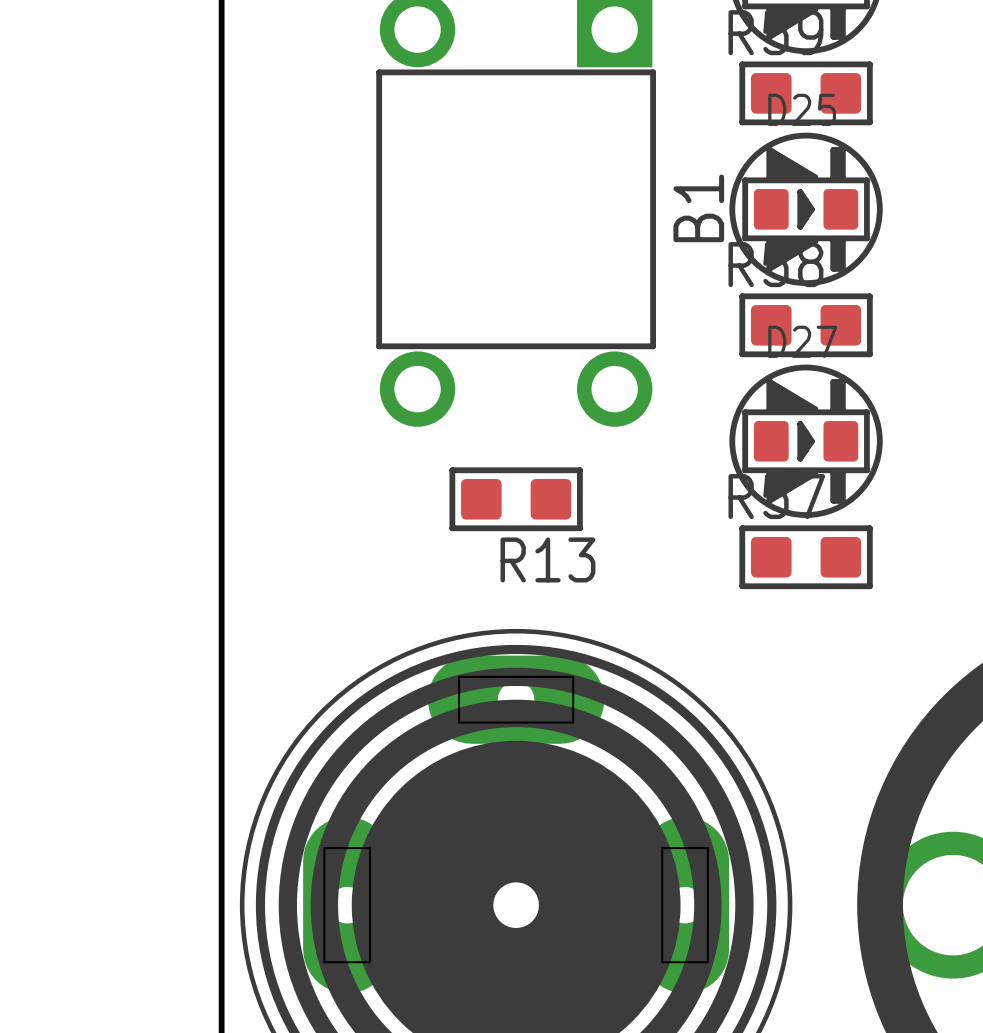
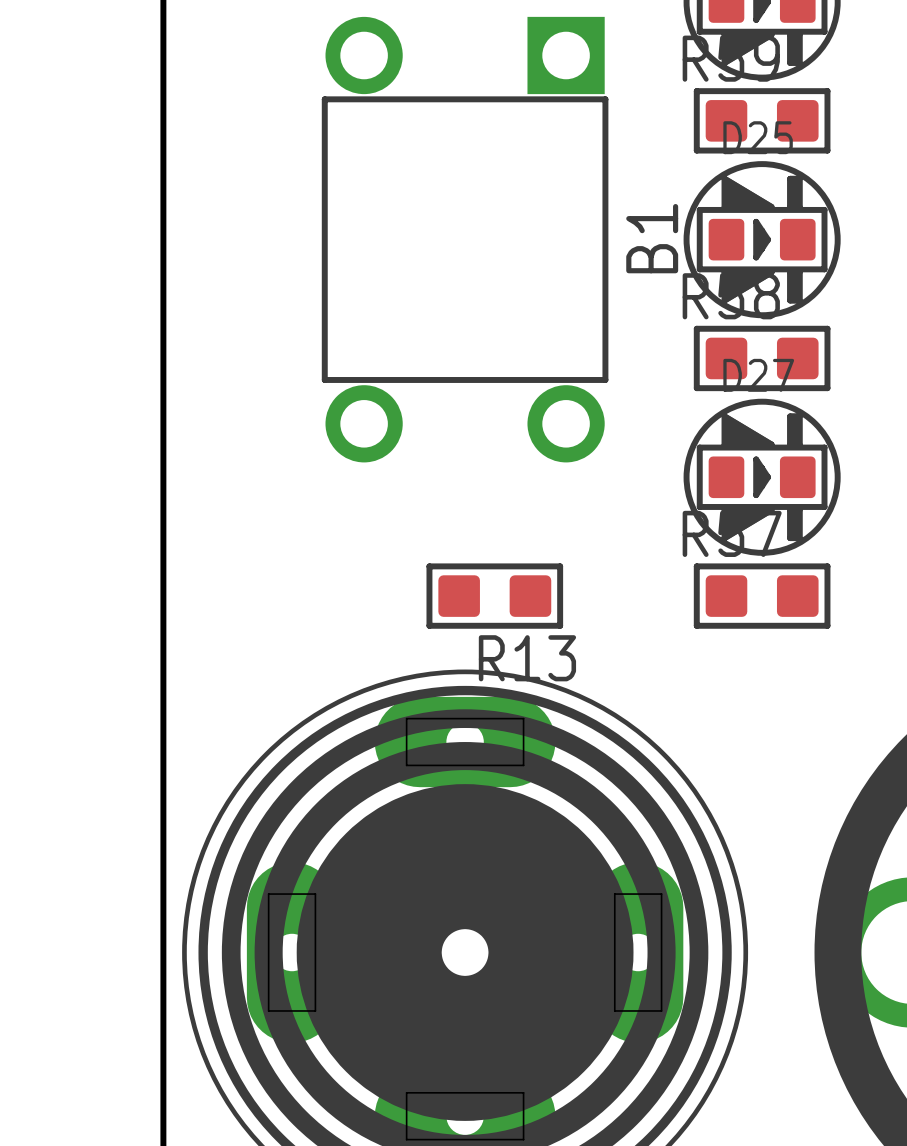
R13 position: (516, 499) -> (494, 596)

